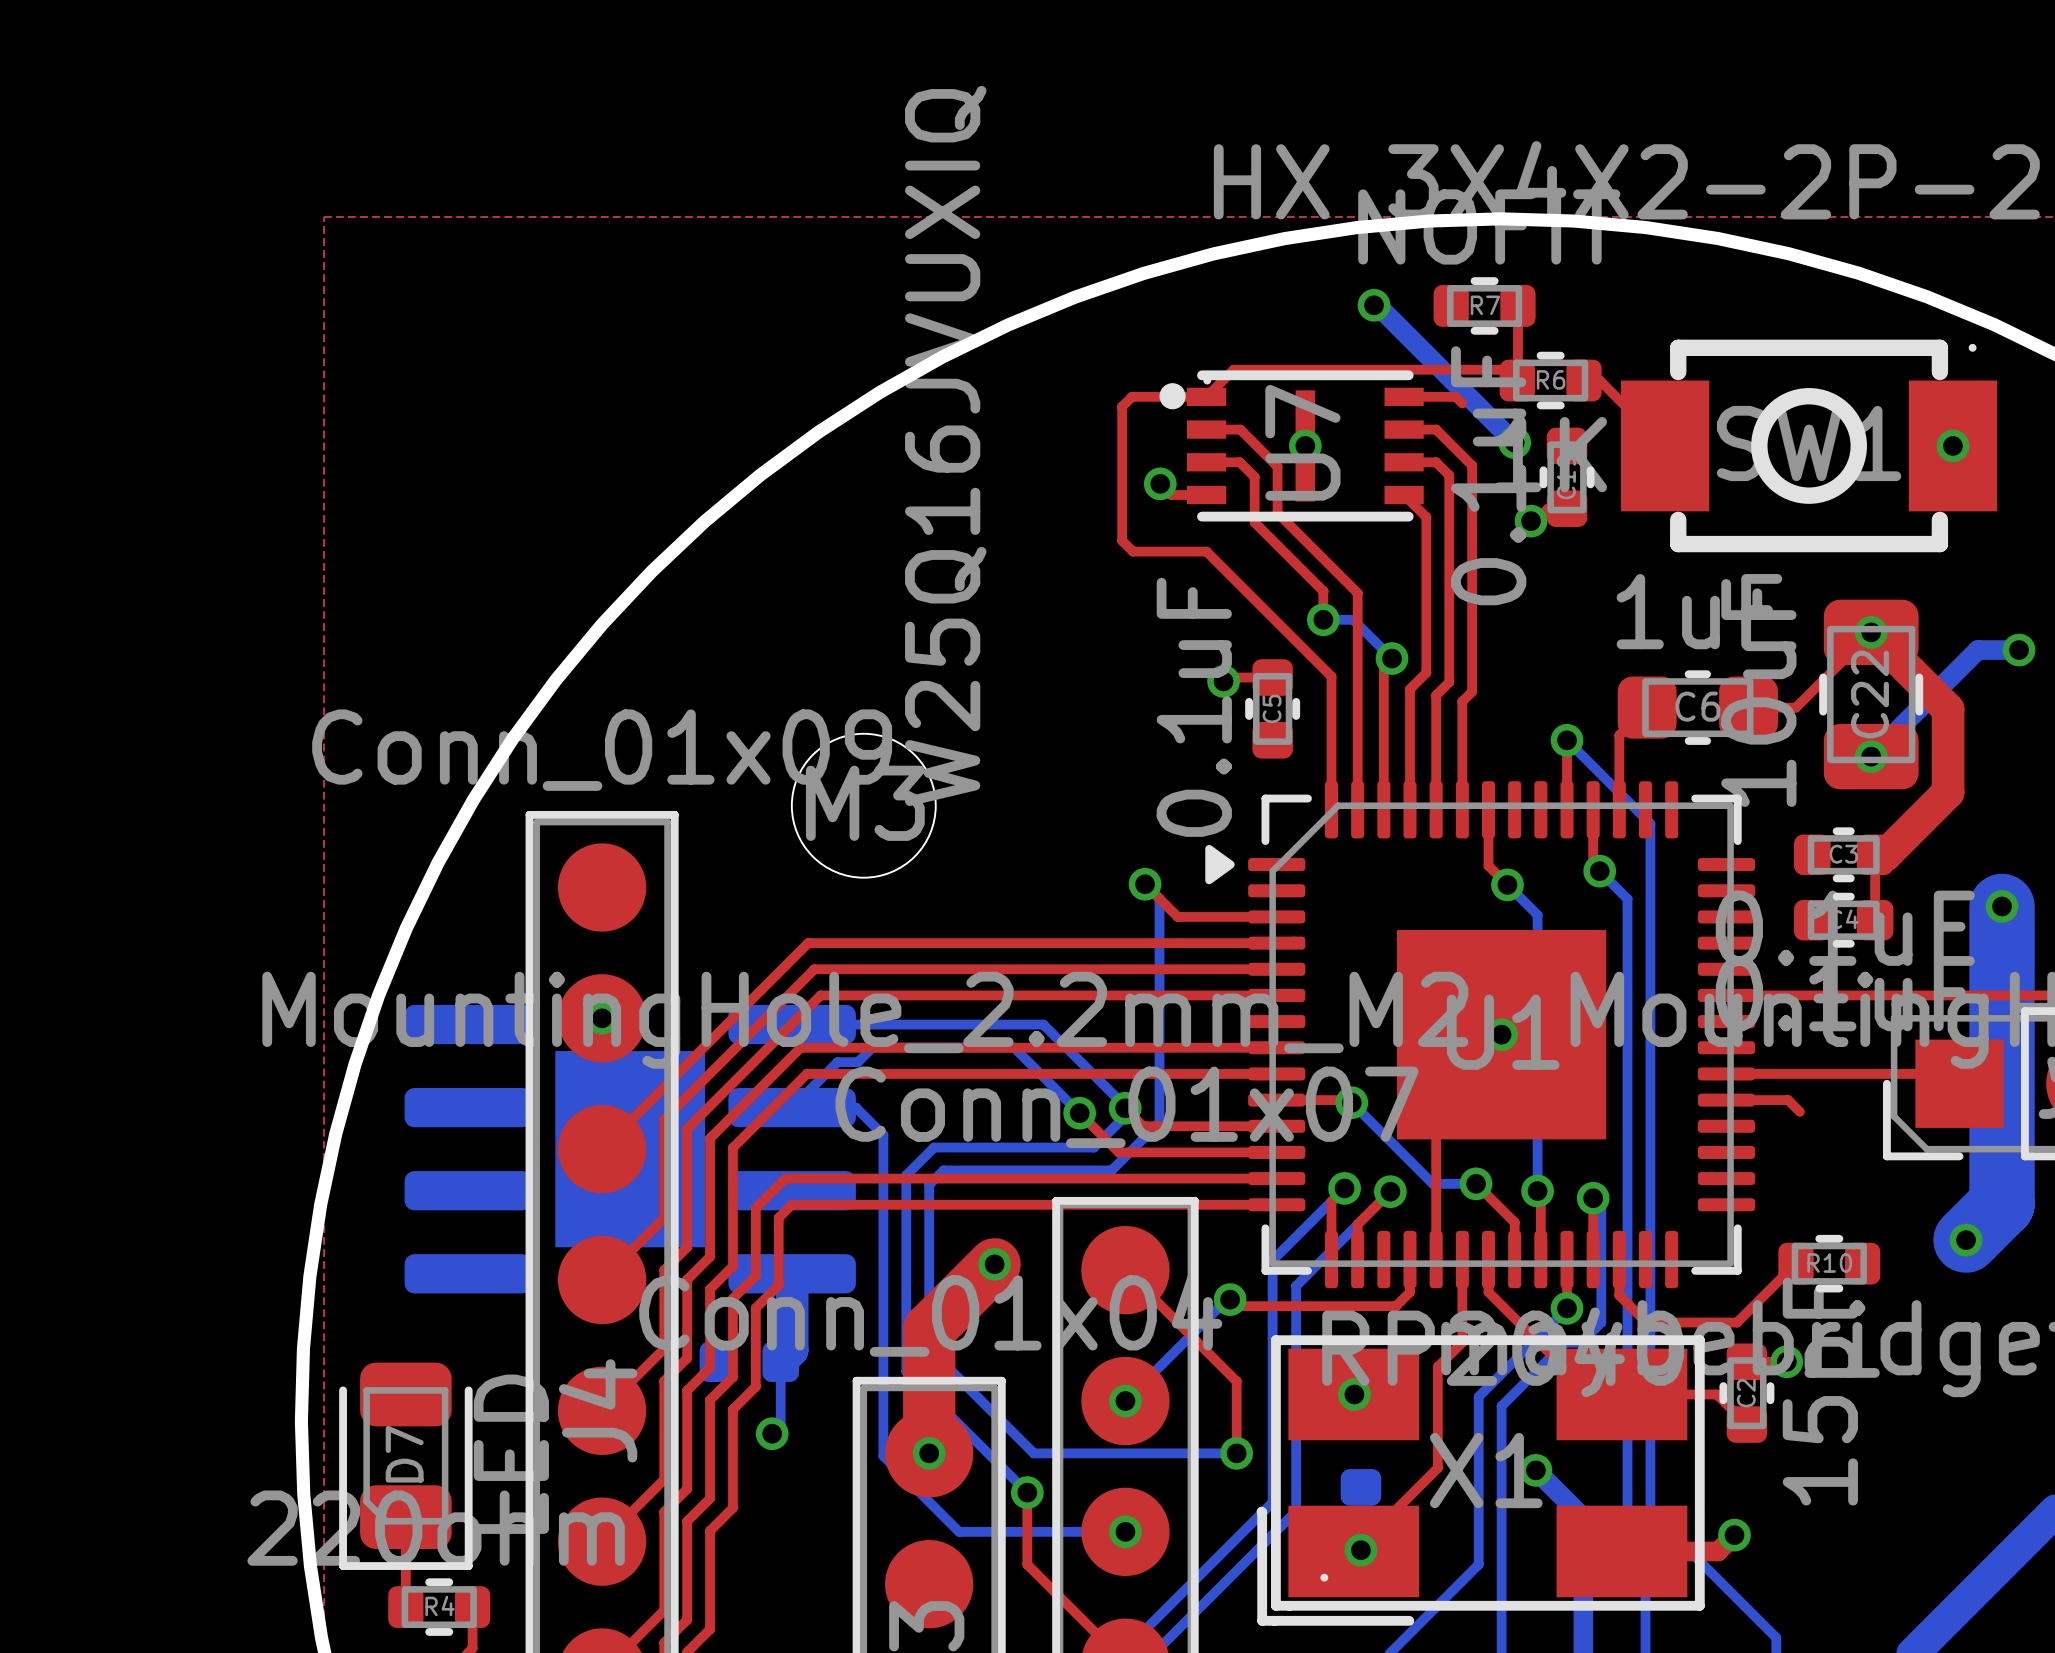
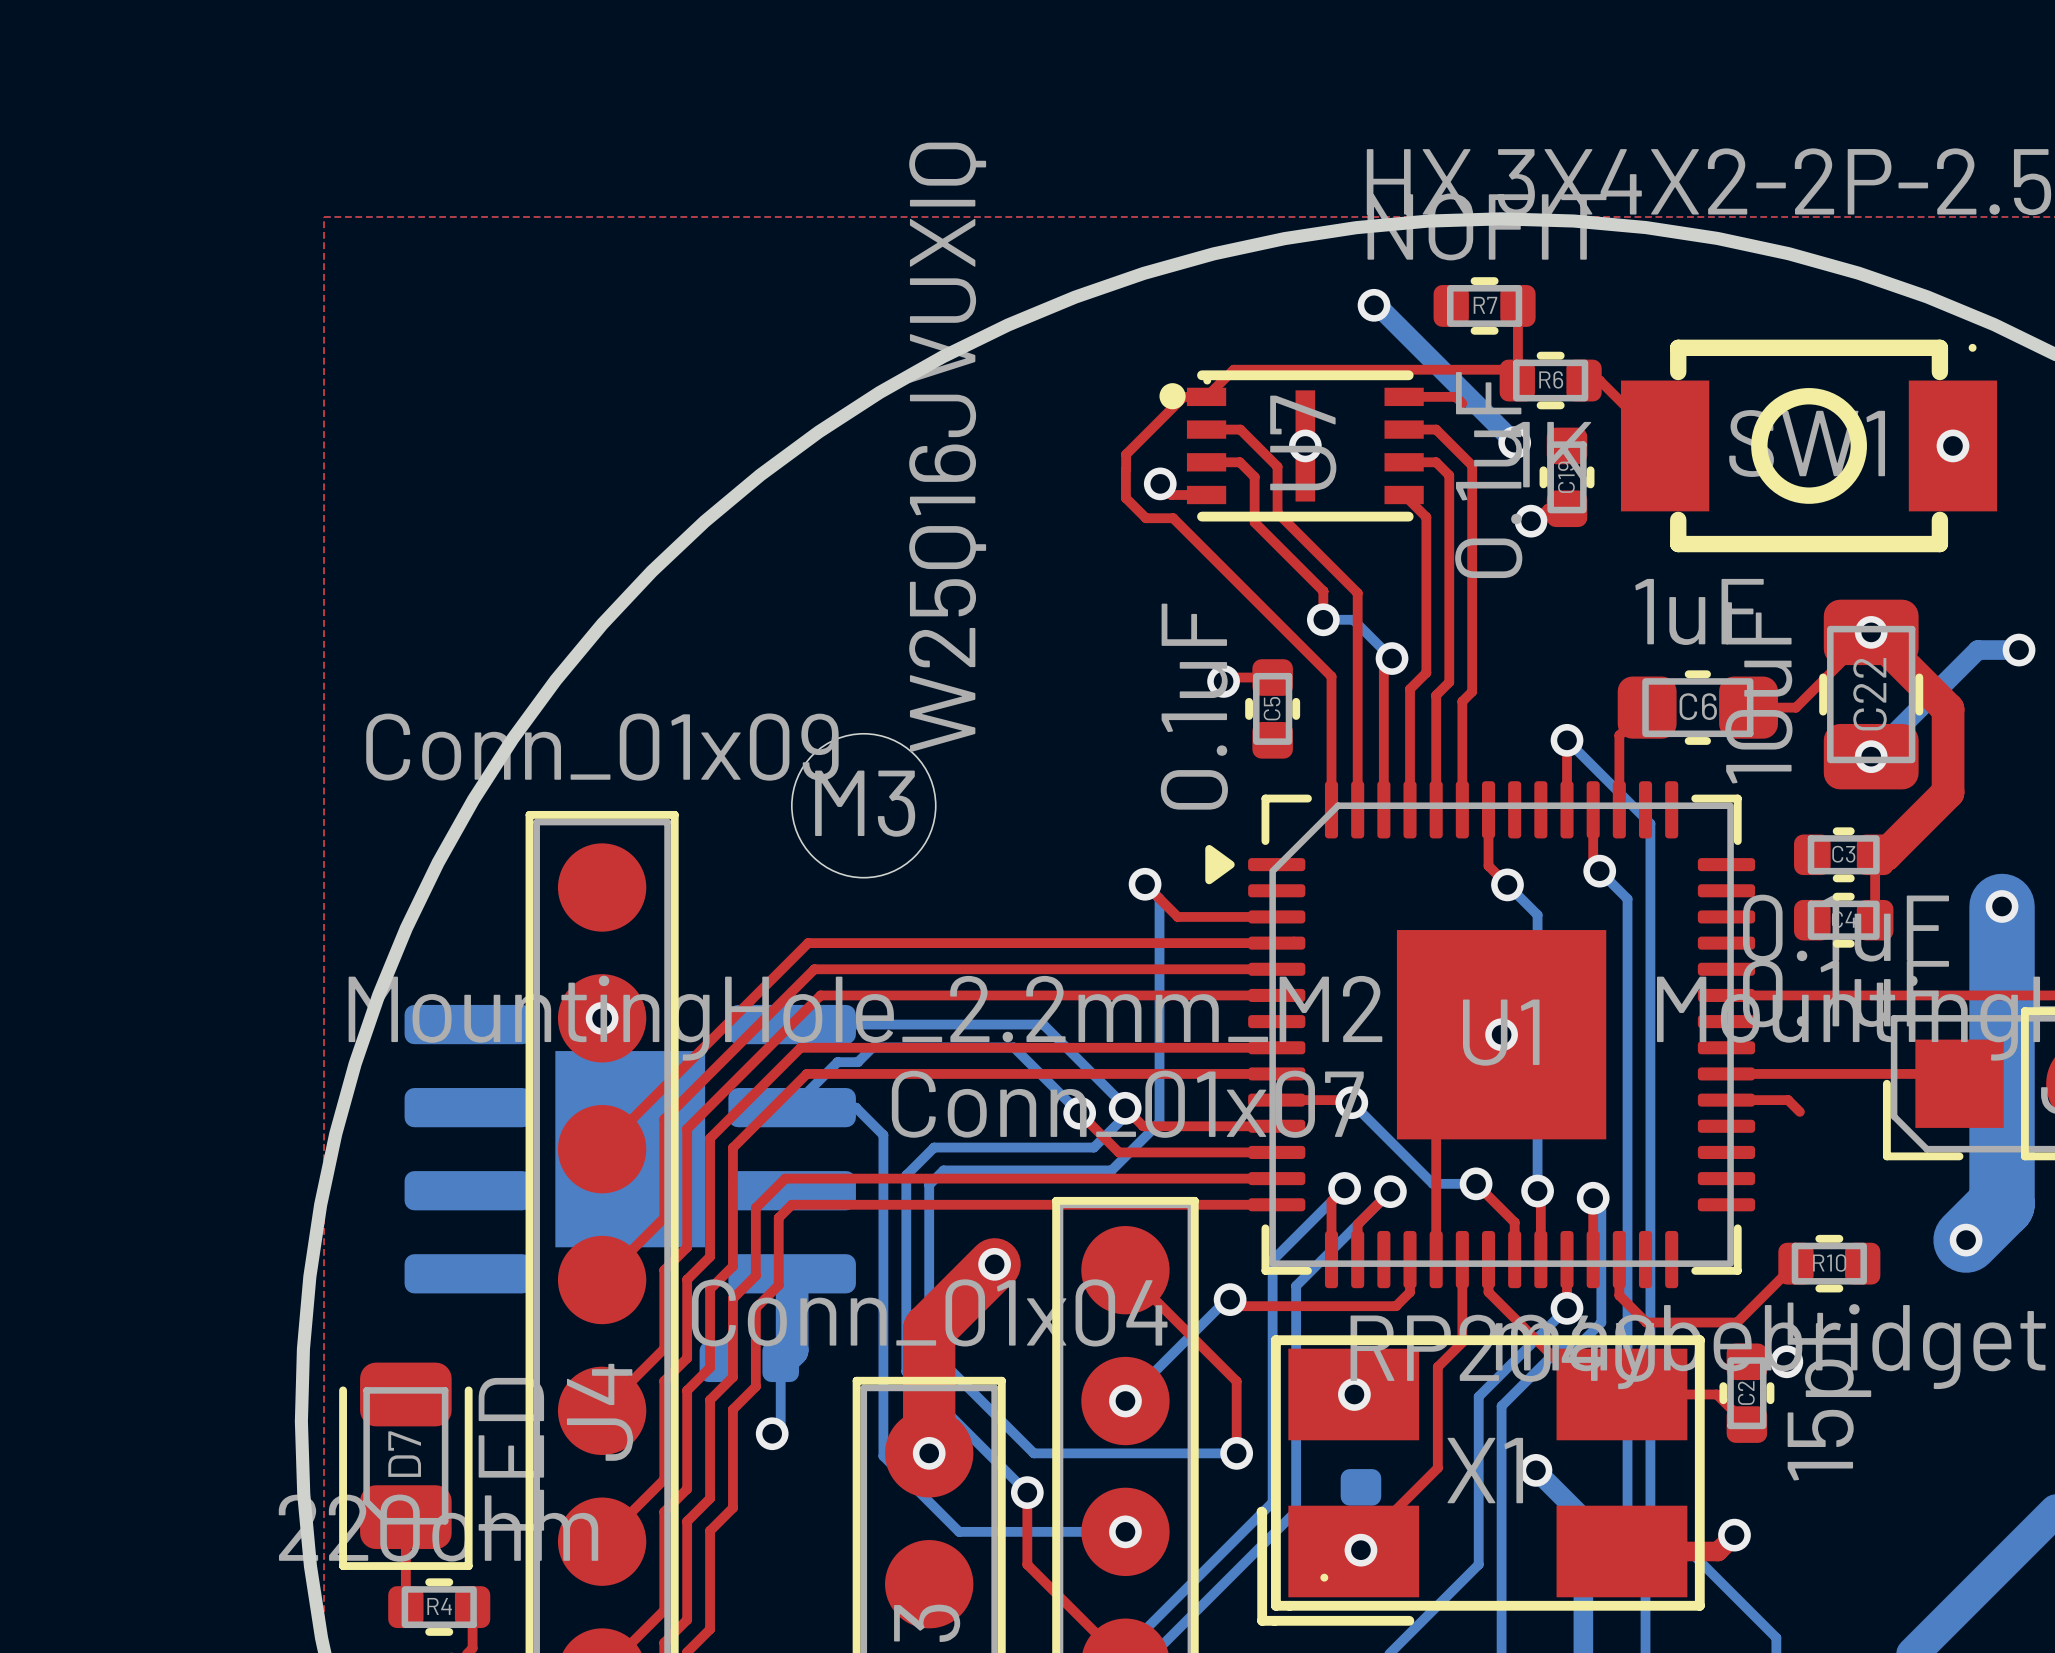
top track: (1183, 396) (1131, 396) (1122, 406) (1122, 540) (1132, 551) (1206, 551) -> (1183, 396) (1126, 454) (1125, 498) (1146, 518) (1173, 518) (1206, 551)

